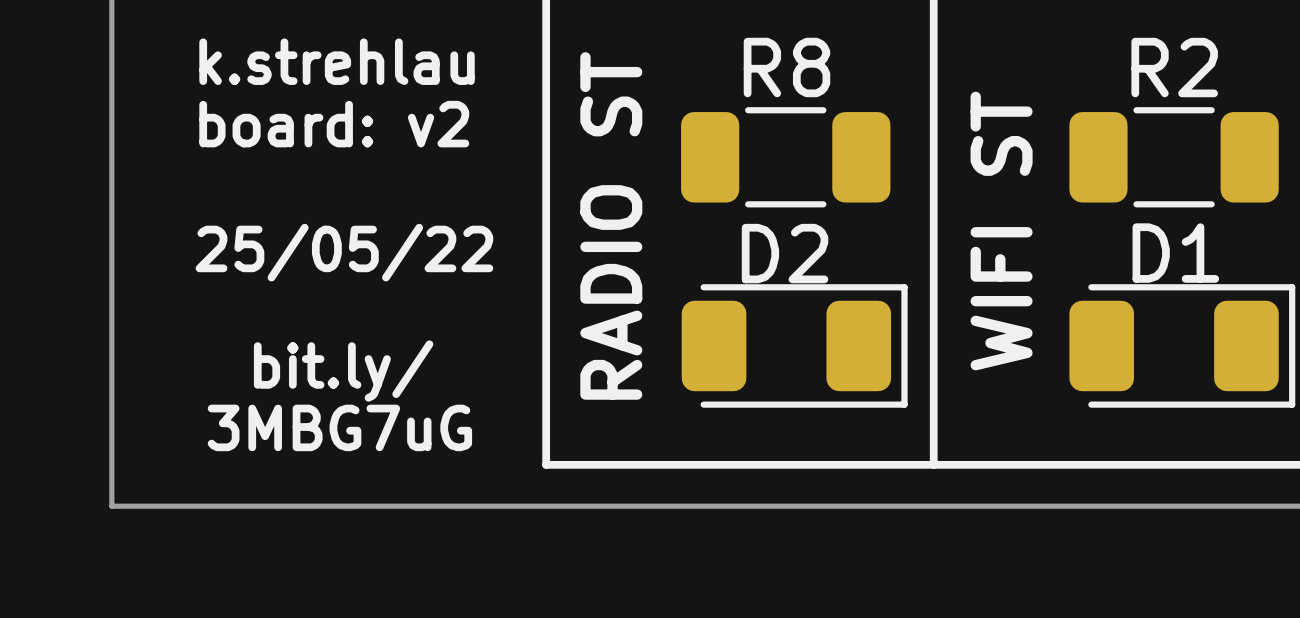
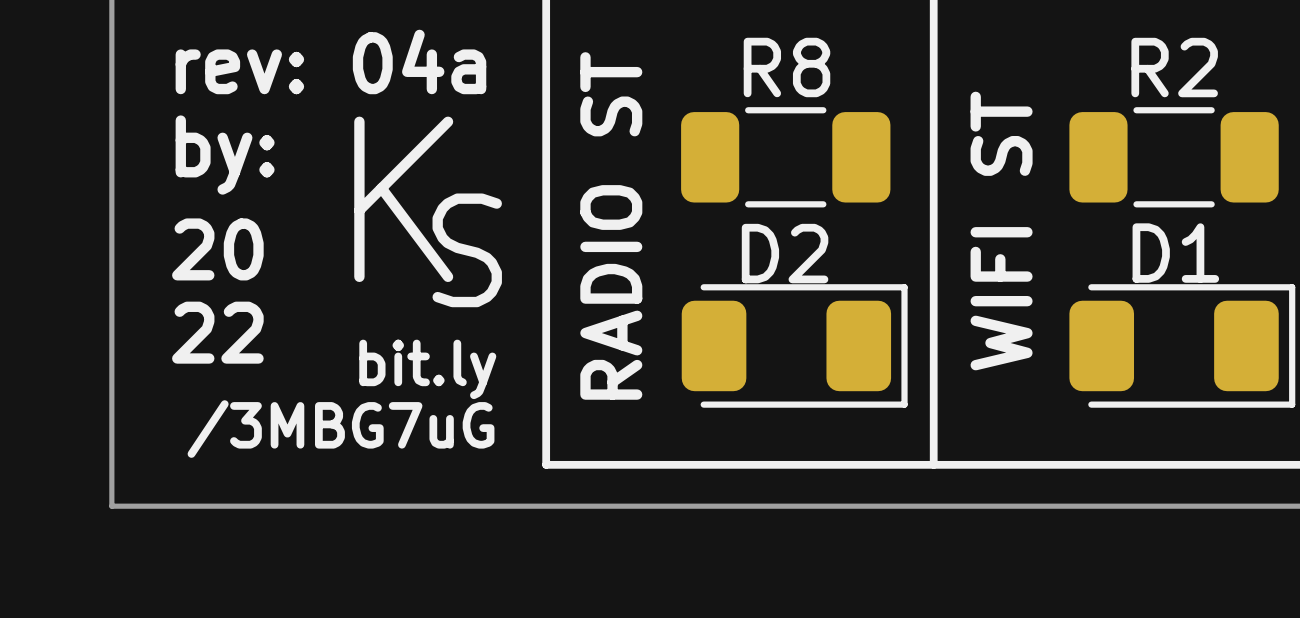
text: k.strehlau (337, 61) -> rev: 04a (330, 61)
text: board: v2 (334, 124) -> none
text: none -> by: (225, 155)
text: none -> K (403, 199)
text: none -> S (467, 250)
text: 25/05/22 (344, 252) -> 20 (217, 249)
text: none -> 22 (217, 332)
text: bit.ly/ (343, 371) -> bit.ly (427, 369)
text: 3MBG7uG (339, 427) -> /3MBG7uG (341, 429)

